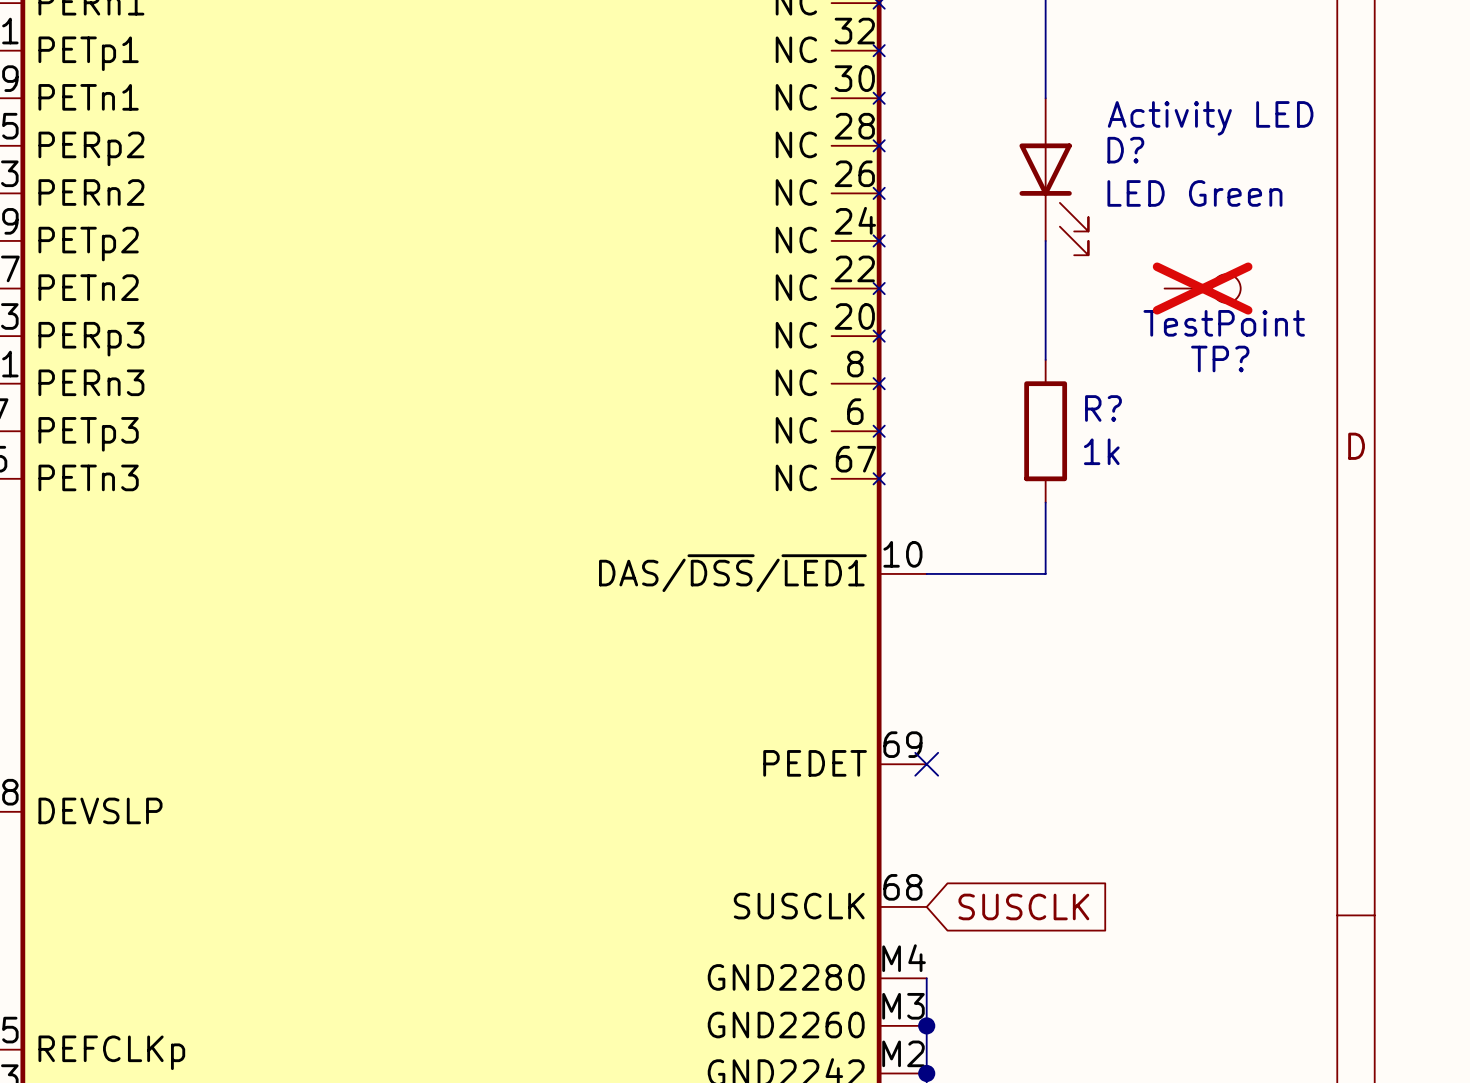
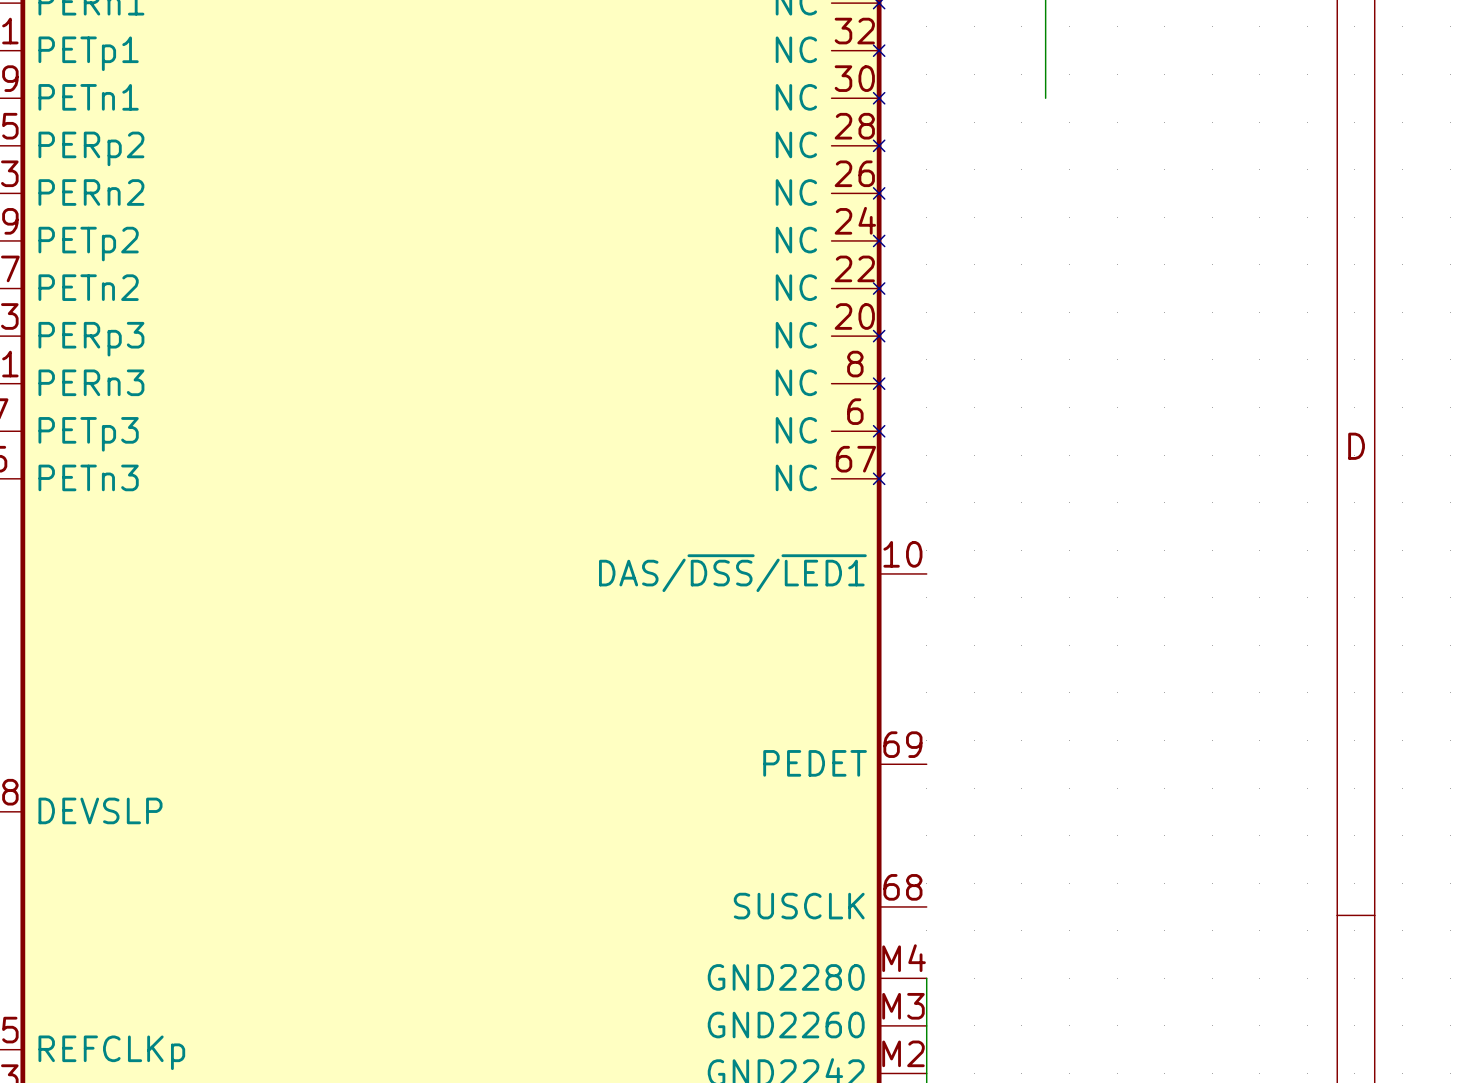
text: Activity LED (1210, 118) -> none
D?: LED Green (1053, 176) -> none
wire: (1045, 240) (1045, 359) -> none
TP?: TestPoint (1202, 288) -> none
R?: 1k (1045, 431) -> none
wire: (1045, 502) (1045, 573) (926, 573) -> none
no-connect mark: (926, 764) -> none
global label: SUSCLK (1023, 906) -> none
junction: (926, 1025) -> none
junction: (926, 1073) -> none

